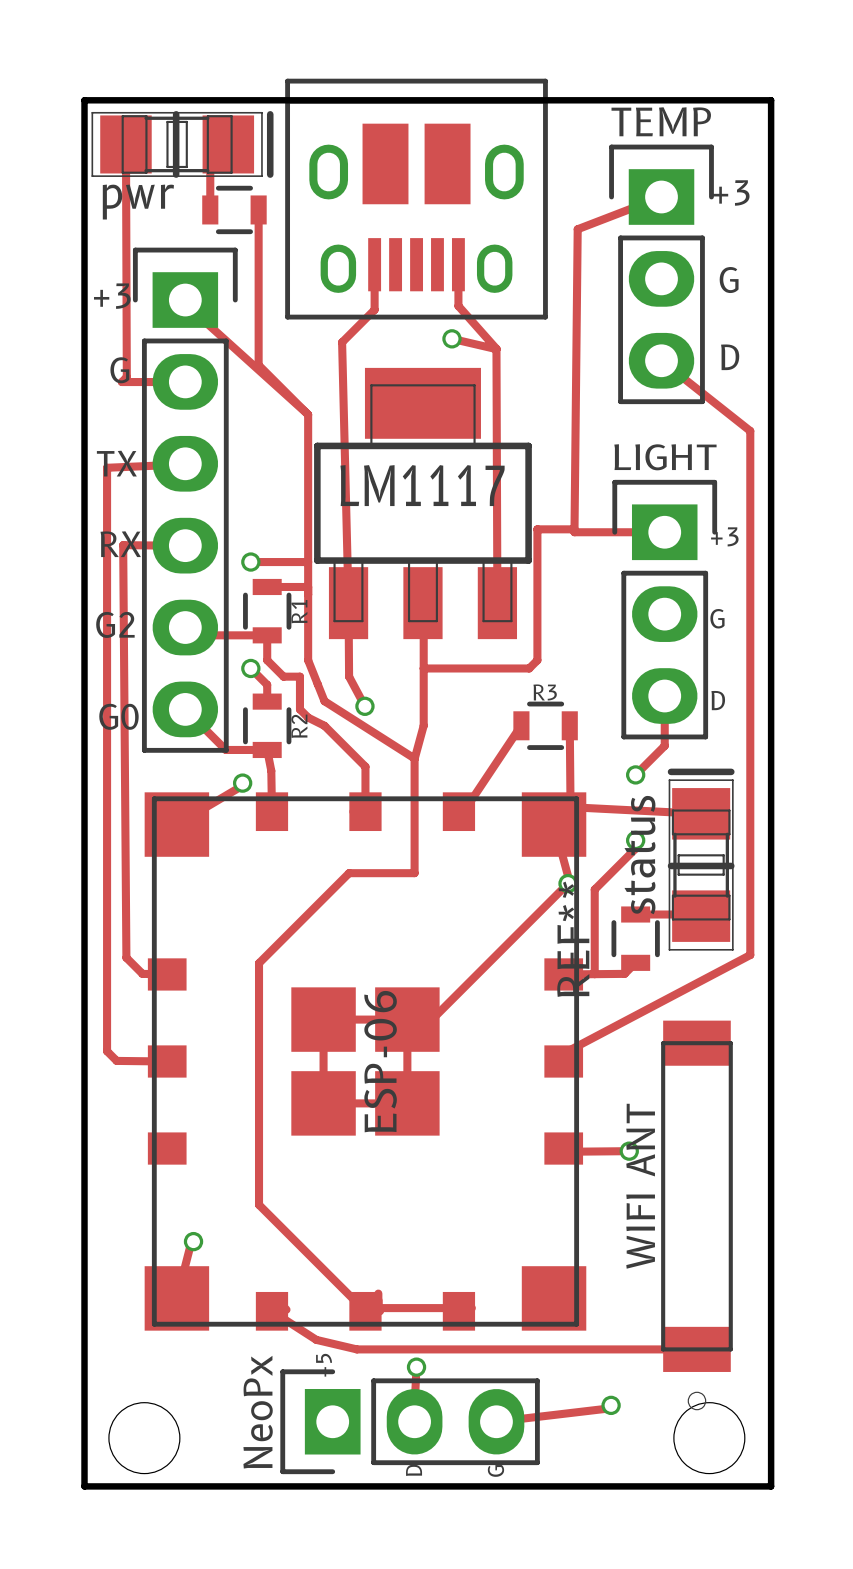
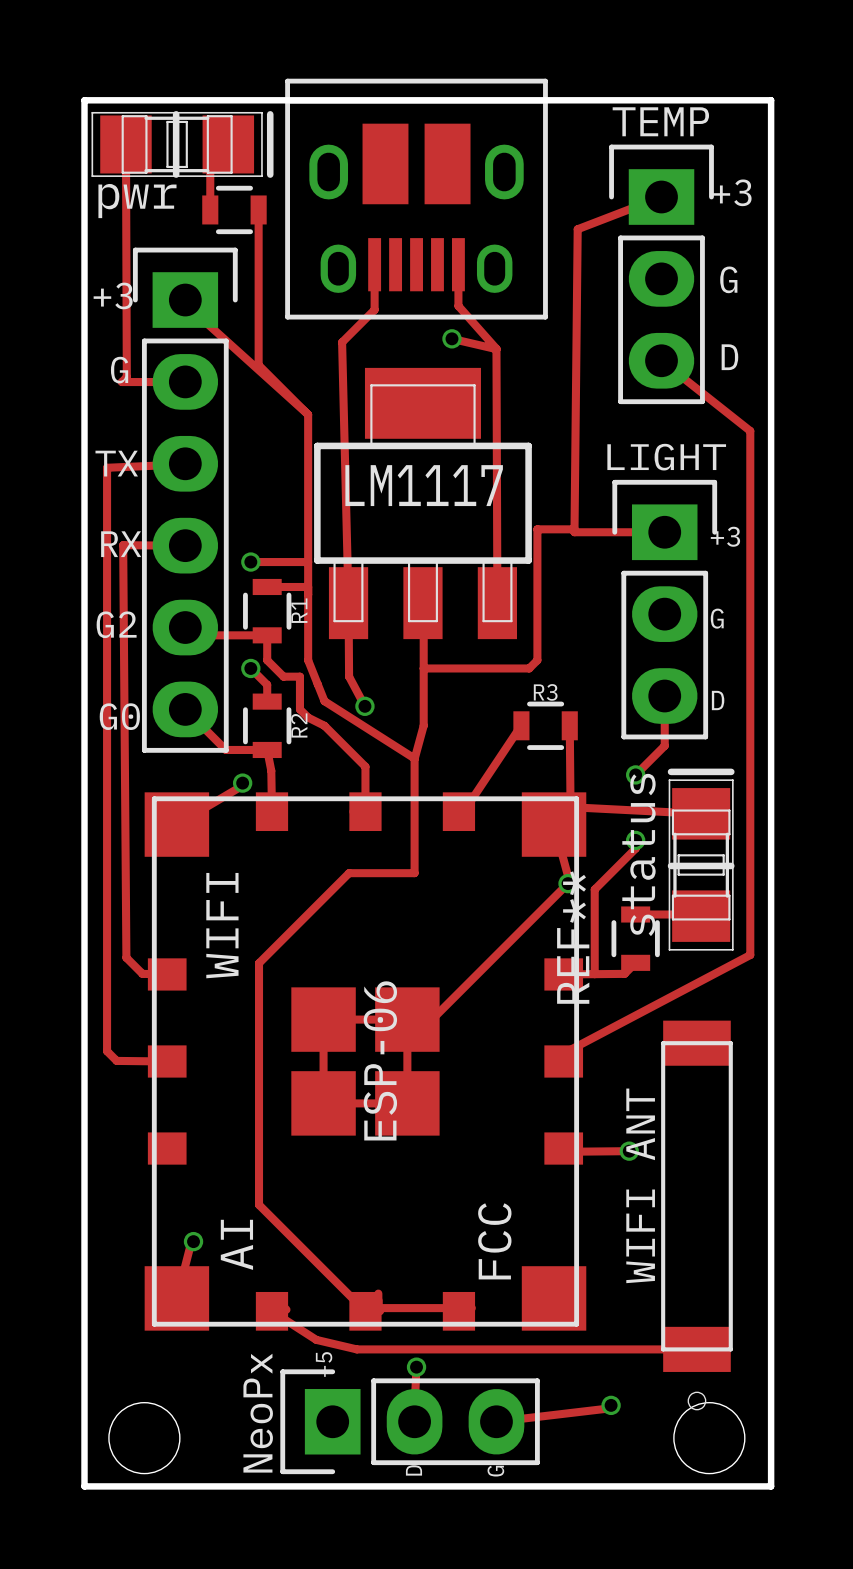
ESP-06 text: none -> WIFI (222, 925)
ESP-06 text: none -> FCC (494, 1241)
ESP-06 text: none -> AI (236, 1244)

